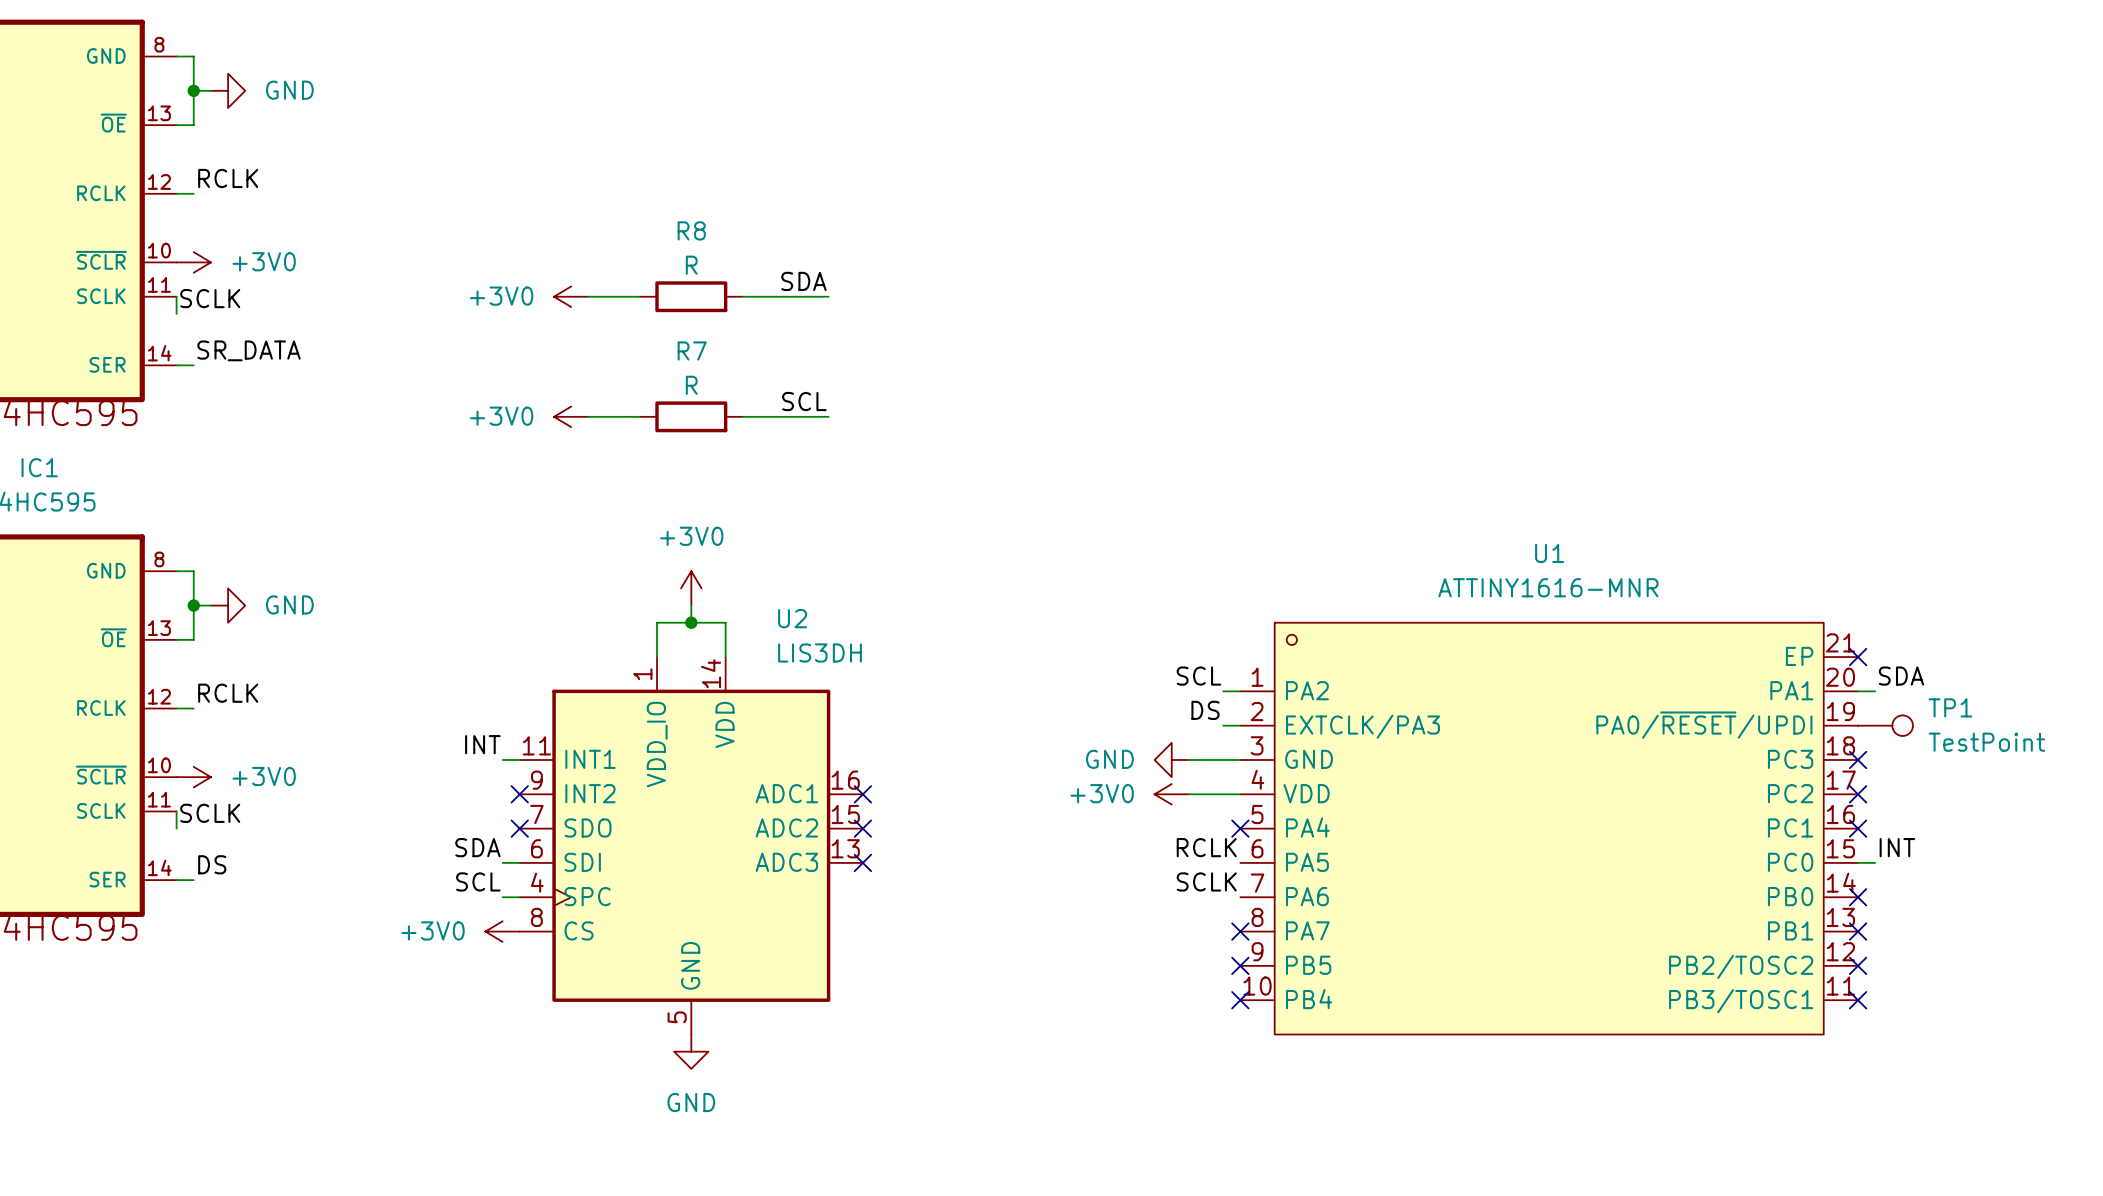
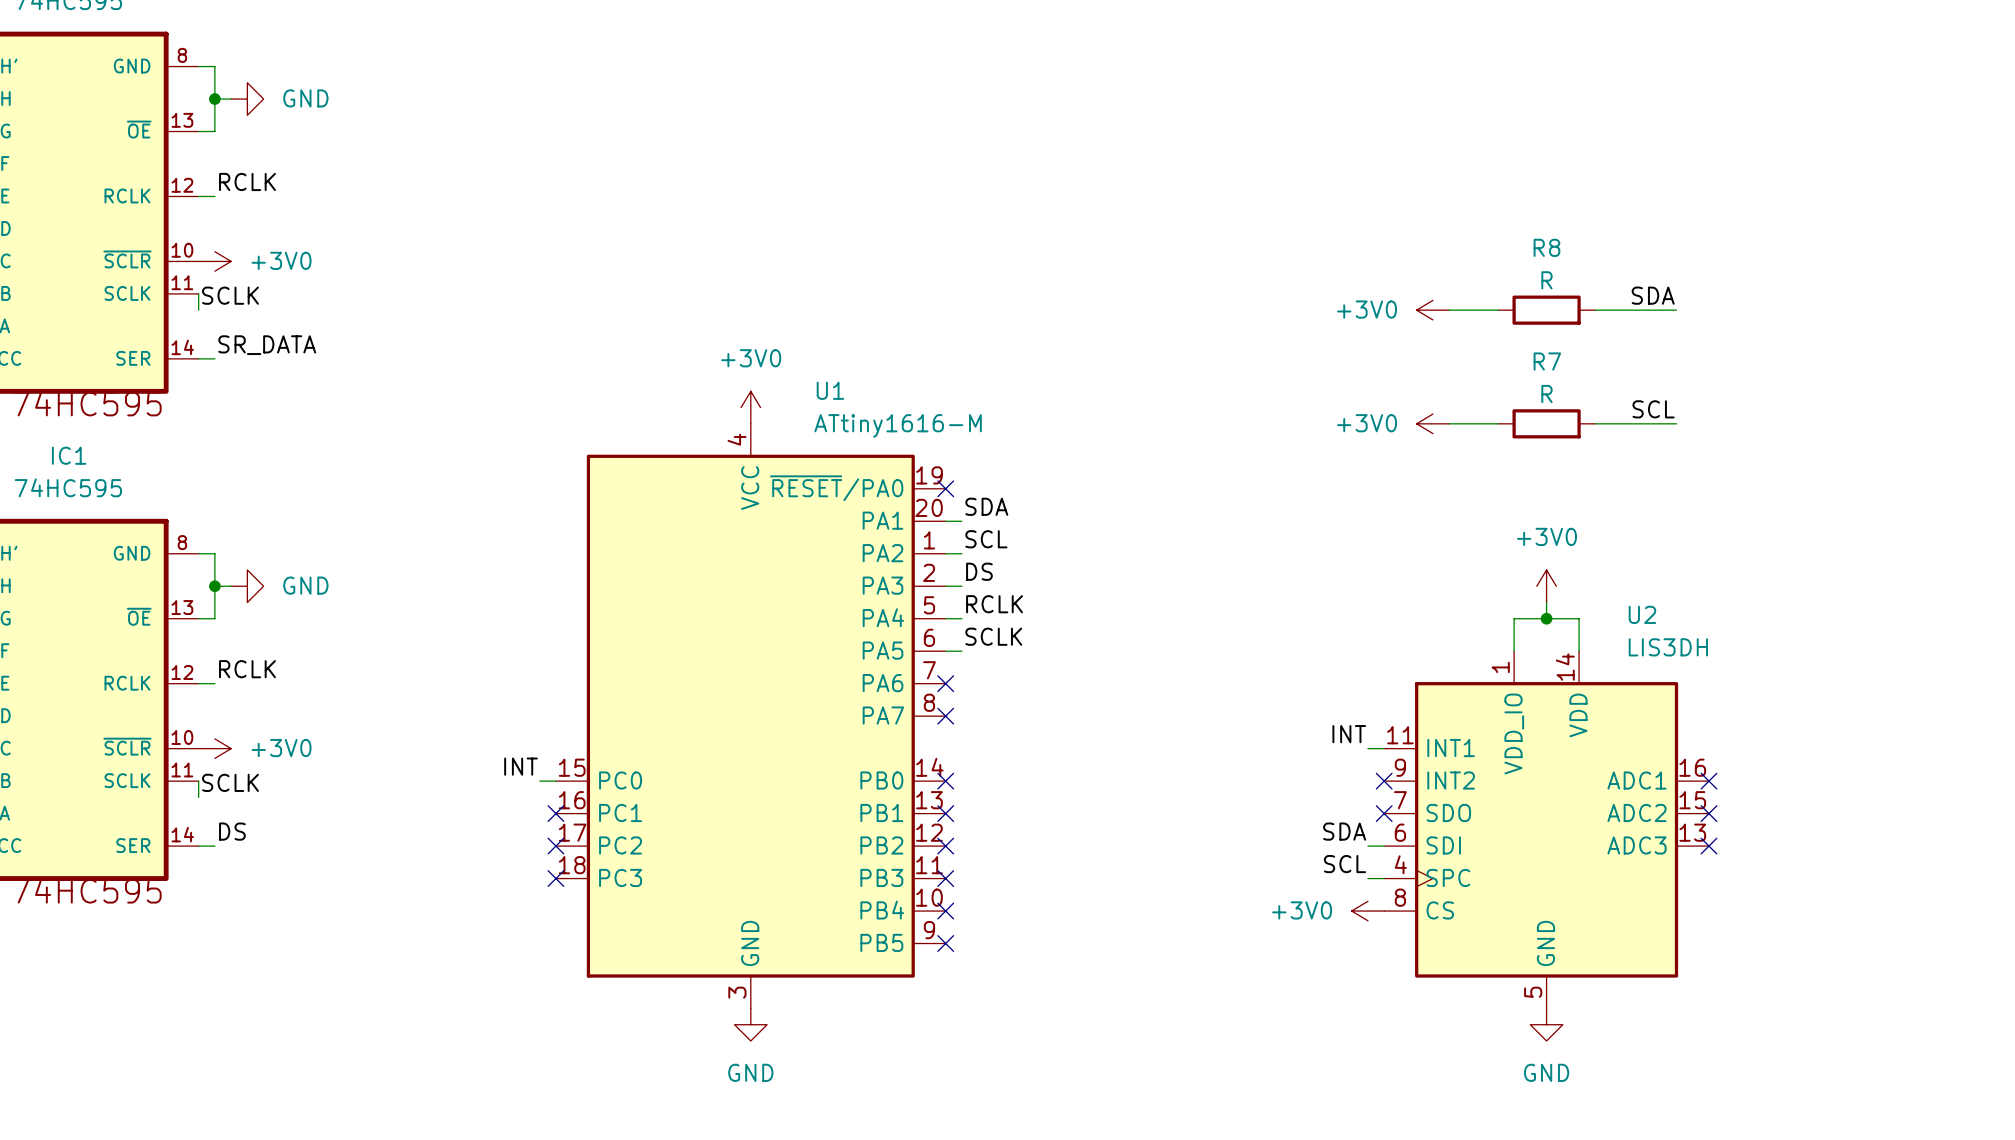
label position: SDA (803, 281) -> SDA (986, 506)
power symbol: +3V0 (571, 296) -> none
wire: (588, 296) (639, 296) -> none
R8 position: (691, 296) -> (1546, 310)
wire: (742, 296) (828, 296) -> none
label: none -> SDA (1653, 295)
power symbol: none -> +3V0 (1432, 310)
wire: none -> (1449, 310) (1497, 310)
wire: none -> (1595, 310) (1676, 310)
label: SCL (804, 401) -> none
power symbol: +3V0 (571, 416) -> none
wire: (588, 416) (639, 416) -> none
R7 position: (691, 416) -> (1546, 423)
wire: (742, 416) (828, 416) -> none
power symbol: none -> +3V0 (750, 407)
label: none -> SCL (1653, 409)
power symbol: none -> +3V0 (1432, 423)
wire: none -> (1449, 423) (1497, 423)
wire: none -> (1595, 423) (1676, 423)
no-connect mark: none -> (945, 488)
wire: none -> (945, 521) (961, 521)
U1 name position: U1 (1549, 553) -> U1 (830, 390)
label: none -> SCL (986, 539)
wire: none -> (945, 553) (961, 553)
U1 value: ATTINY1616-MNR (1548, 587) -> ATtiny1616-M (898, 425)
power symbol: +3V0 (691, 588) -> none
wire: none -> (945, 586) (961, 586)
power symbol: none -> +3V0 (1546, 586)
junction: (691, 622) -> none
U1 symbol: [1240, 622, 1859, 1035] -> [555, 423, 946, 1009]
label: none -> RCLK (994, 604)
junction: none -> (1546, 618)
no-connect mark: (1858, 657) -> none
label: none -> SCLK (993, 636)
label: SCL (1198, 676) -> none
label: SDA (1901, 676) -> none
wire: (1223, 691) (1240, 691) -> (945, 618) (961, 618)
wire: (1858, 691) (1875, 691) -> none
no-connect mark: none -> (945, 683)
label position: DS (1205, 710) -> DS (979, 571)
wire: (1223, 725) (1240, 725) -> (945, 651) (961, 651)
TP1: TestPoint (1885, 725) -> none
no-connect mark: none -> (945, 716)
label position: INT (482, 744) -> INT (521, 766)
wire: (502, 759) (519, 759) -> (539, 781) (555, 781)
power symbol: GND (1171, 759) -> none
wire: (1188, 759) (1240, 759) -> none
no-connect mark: (1858, 759) -> none
label: none -> INT (1349, 734)
no-connect mark: (519, 794) -> none
no-connect mark: (862, 794) -> none
power symbol: +3V0 (1171, 794) -> none
wire: (1188, 794) (1240, 794) -> none
no-connect mark: (1858, 794) -> none
no-connect mark: none -> (945, 781)
no-connect mark: none -> (1384, 781)
no-connect mark: none -> (1708, 781)
no-connect mark: (519, 828) -> none
no-connect mark: (862, 828) -> none
no-connect mark: (1240, 828) -> none
no-connect mark: (1858, 828) -> none
no-connect mark: none -> (555, 813)
U2 position: (691, 845) -> (1546, 829)
no-connect mark: none -> (945, 813)
no-connect mark: none -> (1384, 813)
no-connect mark: none -> (1708, 813)
label: SDA (477, 847) -> none
label: RCLK (1206, 847) -> none
label: INT (1897, 847) -> none
wire: (502, 862) (519, 862) -> none
no-connect mark: (862, 862) -> none
wire: (1858, 862) (1875, 862) -> none
label: none -> SDA (1344, 831)
no-connect mark: none -> (555, 846)
no-connect mark: none -> (945, 846)
no-connect mark: none -> (1708, 846)
label: SCL (478, 881) -> none
label: SCLK (1206, 881) -> none
wire: (502, 897) (519, 897) -> none
no-connect mark: (1858, 897) -> none
label: none -> SCL (1345, 864)
no-connect mark: none -> (555, 878)
no-connect mark: none -> (945, 878)
power symbol: +3V0 (502, 931) -> none
no-connect mark: (1240, 931) -> none
no-connect mark: (1858, 931) -> none
no-connect mark: none -> (945, 911)
power symbol: none -> +3V0 (1367, 911)
no-connect mark: (1240, 965) -> none
no-connect mark: (1858, 965) -> none
no-connect mark: none -> (945, 943)
no-connect mark: (1240, 1000) -> none
no-connect mark: (1858, 1000) -> none
power symbol position: GND (691, 1051) -> GND (750, 1024)
power symbol: none -> GND (1546, 1024)

